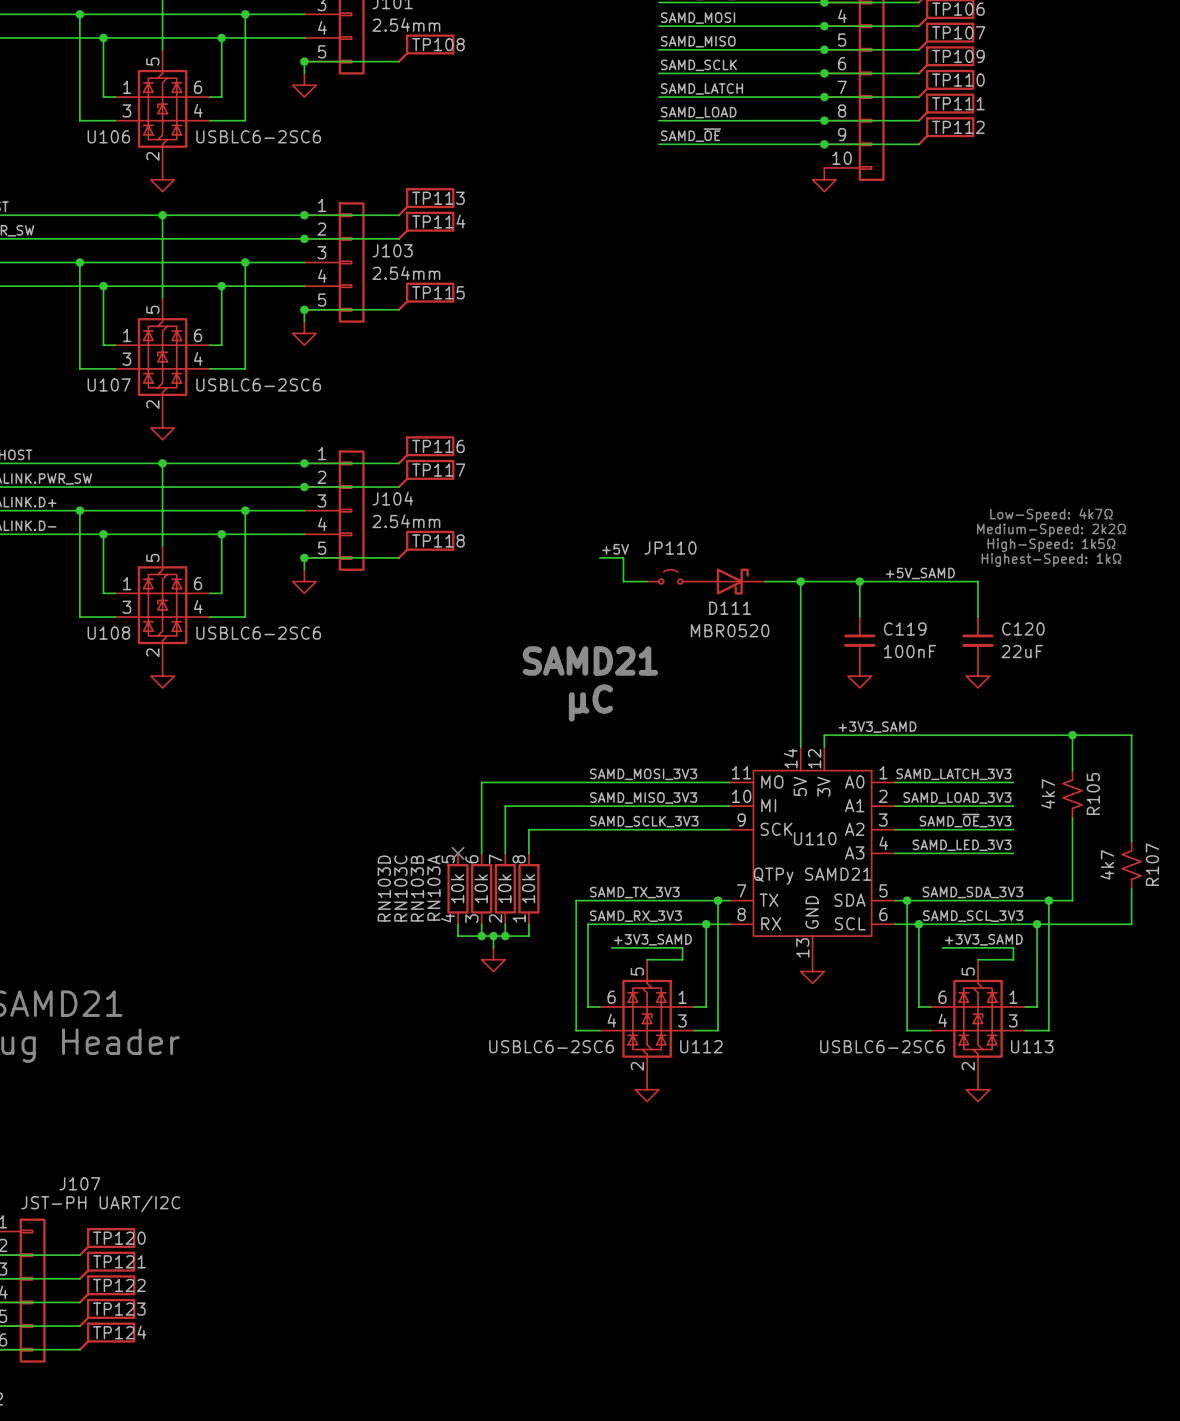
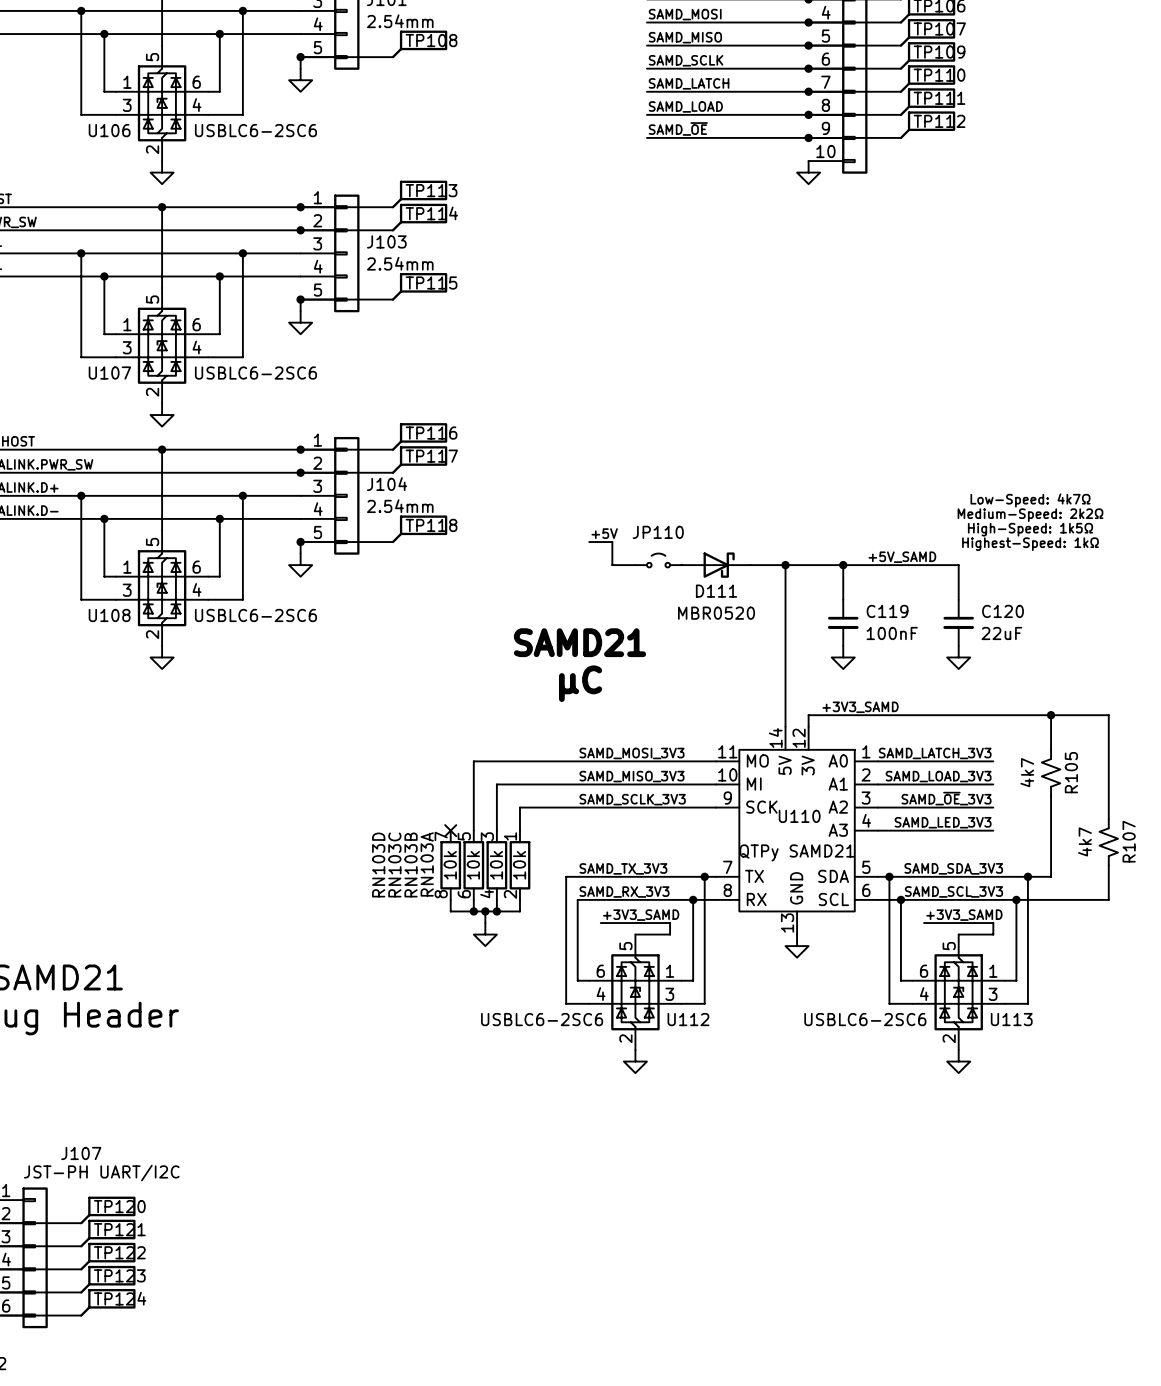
RN103D pin number: 5 (448, 859) -> 7 (441, 836)
RN103C pin number: 6 (471, 859) -> 5 (464, 836)
RN103B pin number: 7 (495, 859) -> 3 (487, 836)
RN103A pin number: 8 (519, 859) -> 1 (510, 836)
RN103D pin number: 4 (448, 918) -> 8 (441, 894)
RN103C pin number: 3 (471, 918) -> 6 (464, 894)
RN103B pin number: 2 (495, 918) -> 4 (487, 893)
RN103A pin number: 1 (519, 918) -> 2 (510, 894)

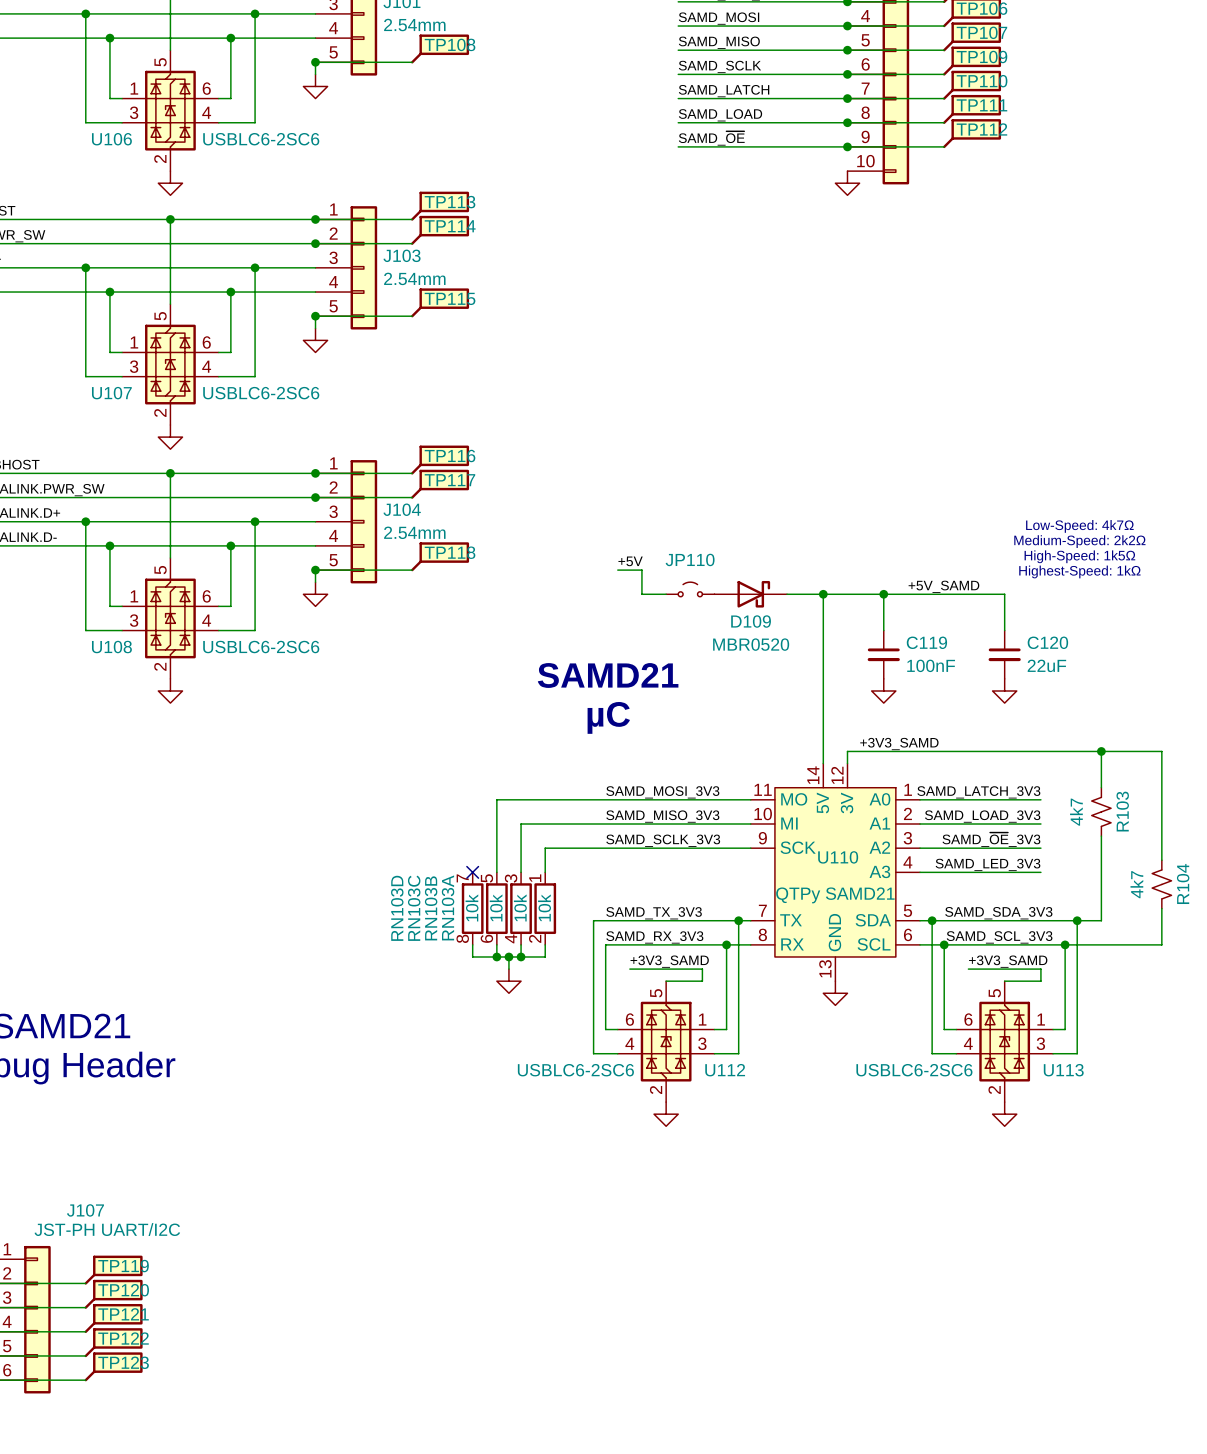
D111 name: D111 (716, 591) -> D109 (751, 621)
R105 name: R105 (1071, 772) -> R103 (1122, 811)
R107 name: R107 (1129, 841) -> R104 (1183, 883)
TP120 name: TP120 (119, 1206) -> TP119 (123, 1266)
TP121 name: TP121 (119, 1229) -> TP120 (123, 1290)
TP122 name: TP122 (119, 1252) -> TP121 (123, 1314)
TP123 name: TP123 (119, 1275) -> TP122 (123, 1338)
TP124 name: TP124 (120, 1298) -> TP123 (123, 1362)

